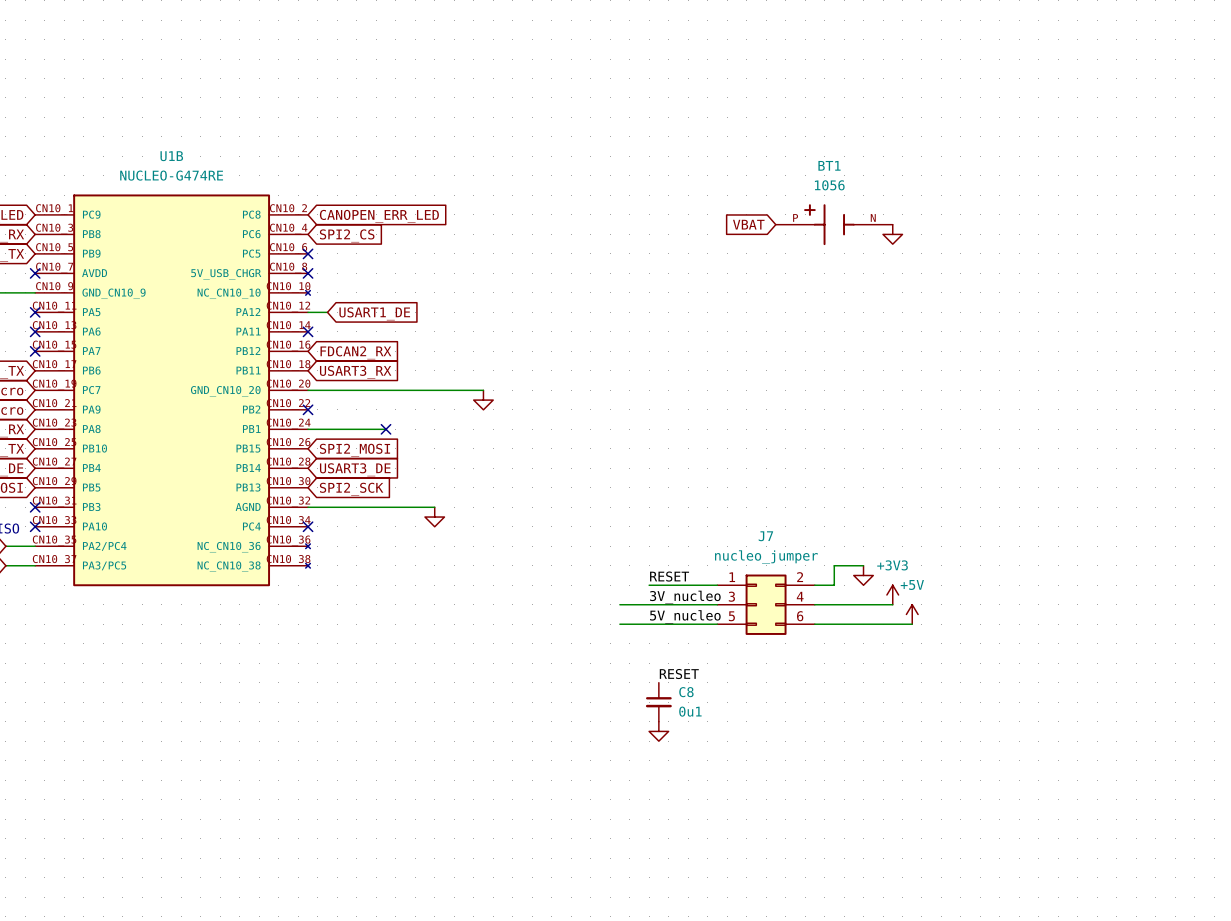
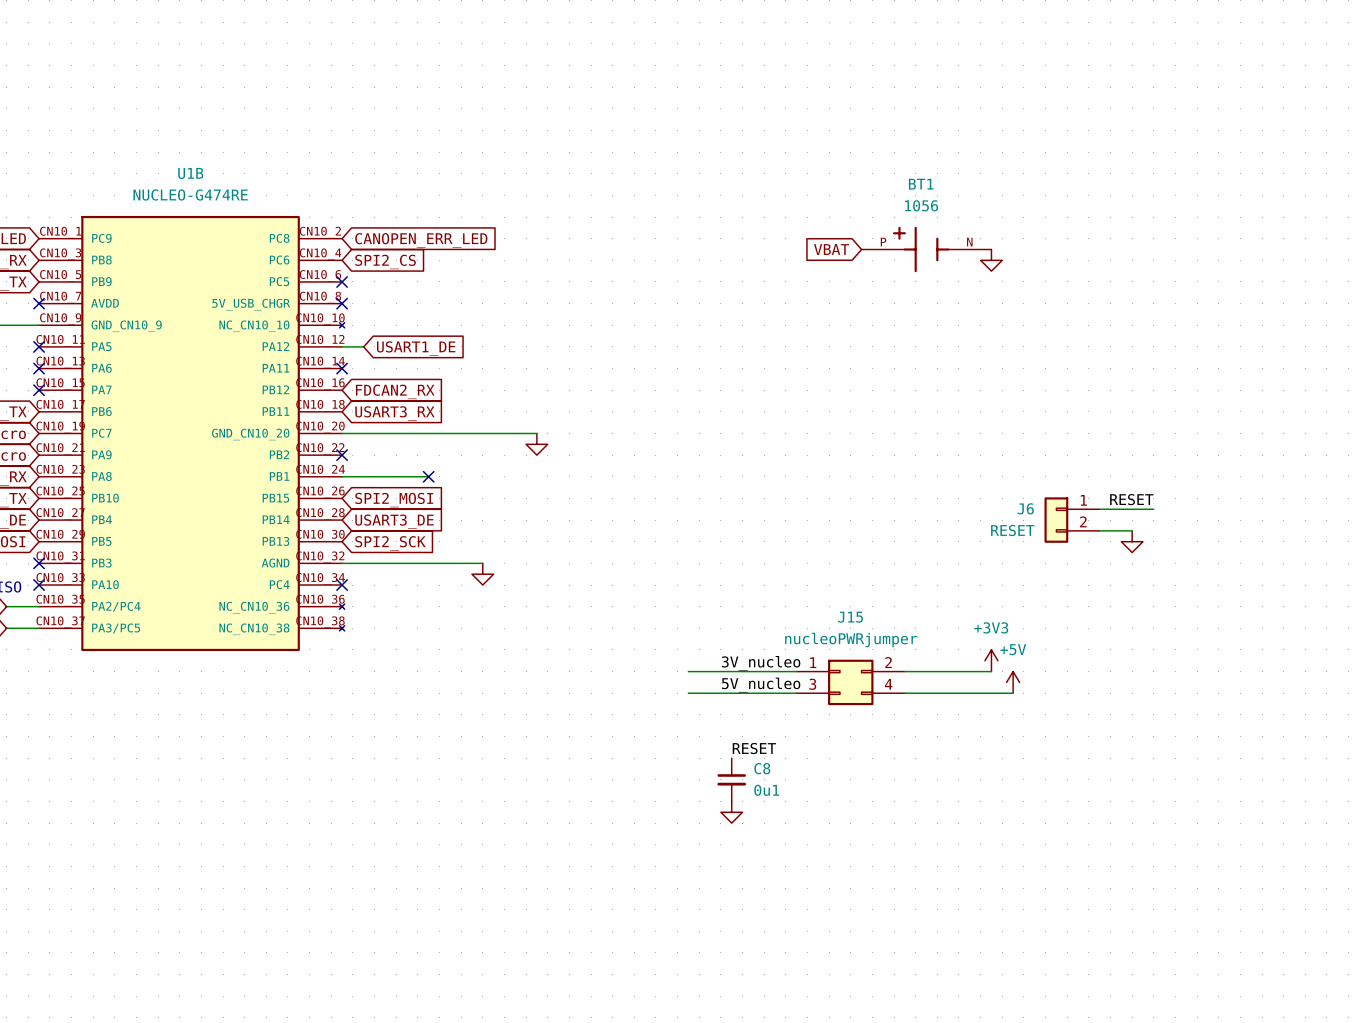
label: none -> RESET (1131, 499)
wire: none -> (1099, 509) (1153, 509)
J6: none -> RESET (1072, 520)
wire: none -> (1099, 530) (1132, 530)
wire: (863, 565) (834, 565) (834, 585) (814, 585) -> none
power symbol position: (863, 575) -> (1132, 541)
label: RESET (669, 576) -> none
wire: (649, 585) (717, 585) -> none
J7: nucleo_jumper (766, 604) -> none
J15: none -> nucleoPWRjumper (850, 682)

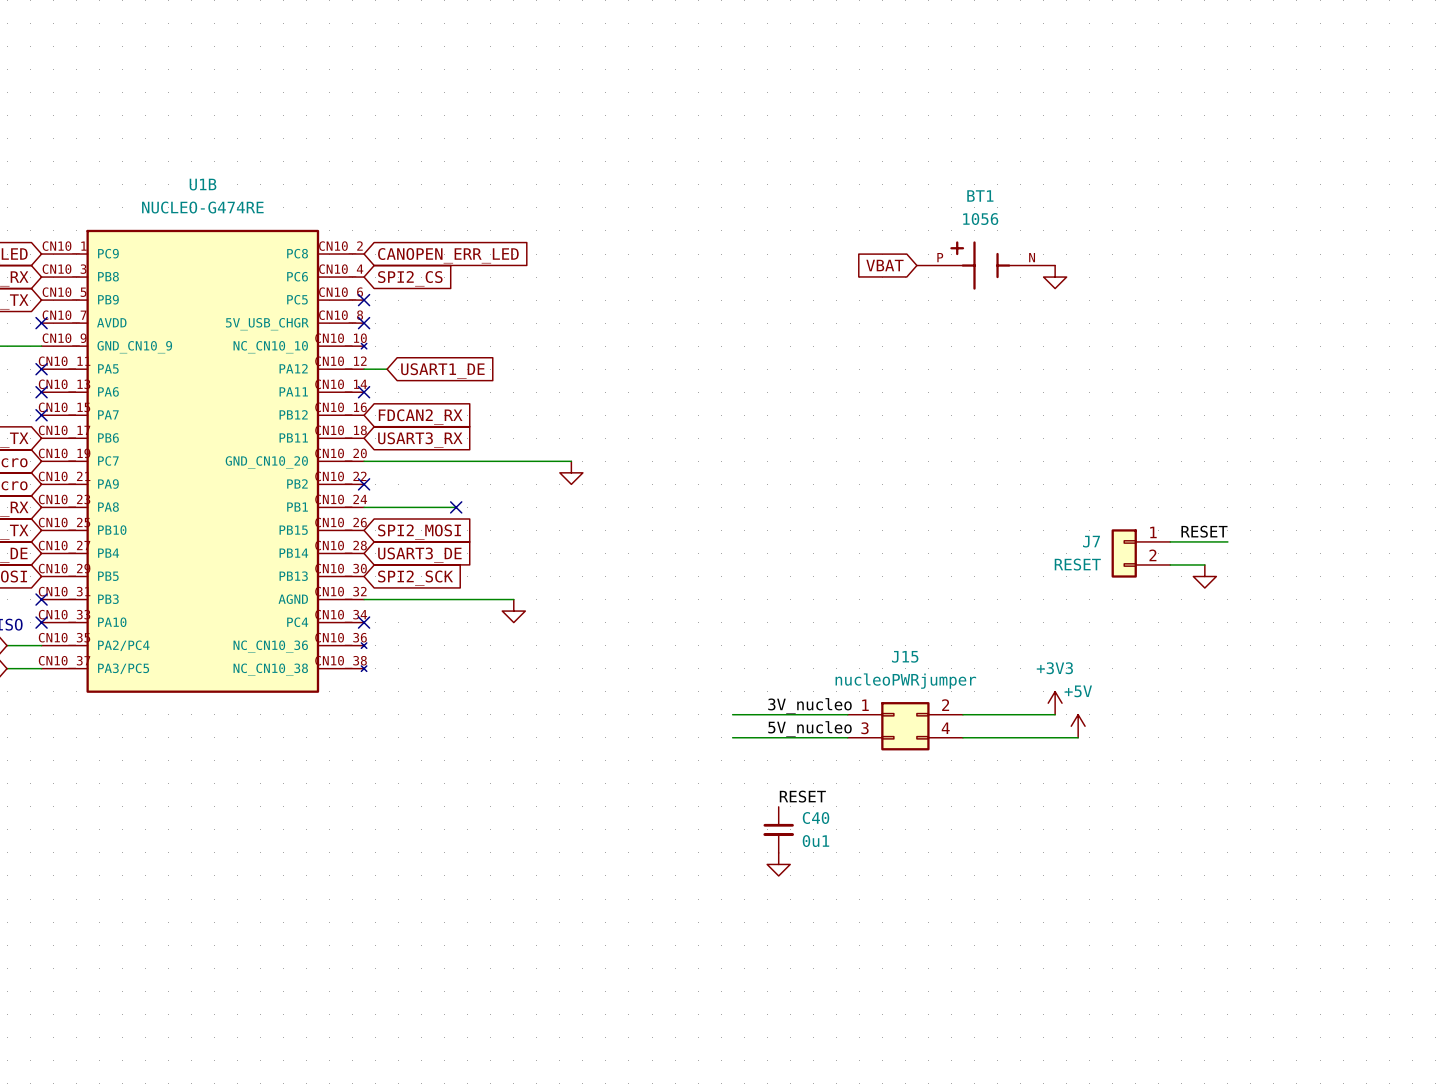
J6 name: J6 (1025, 508) -> J7 (1091, 541)
C8 name: C8 (762, 768) -> C40 (816, 818)

